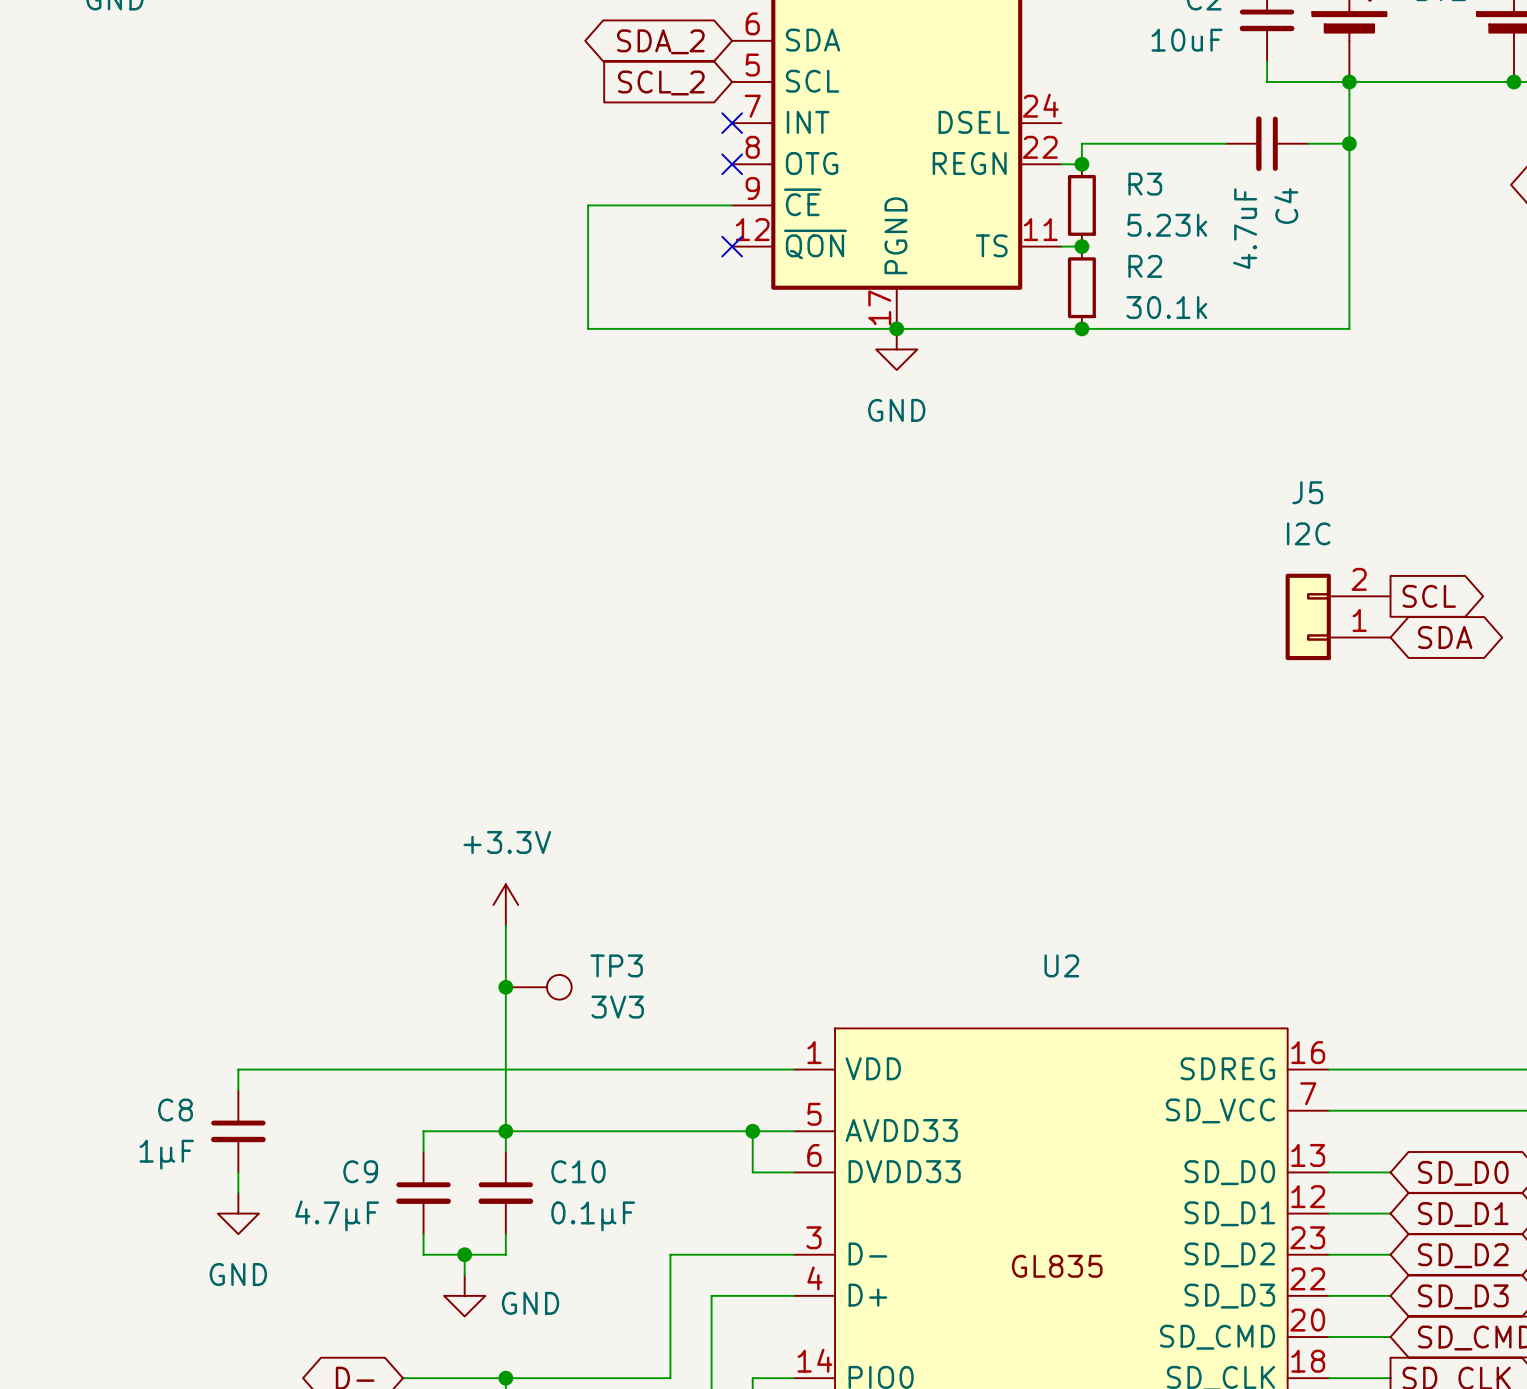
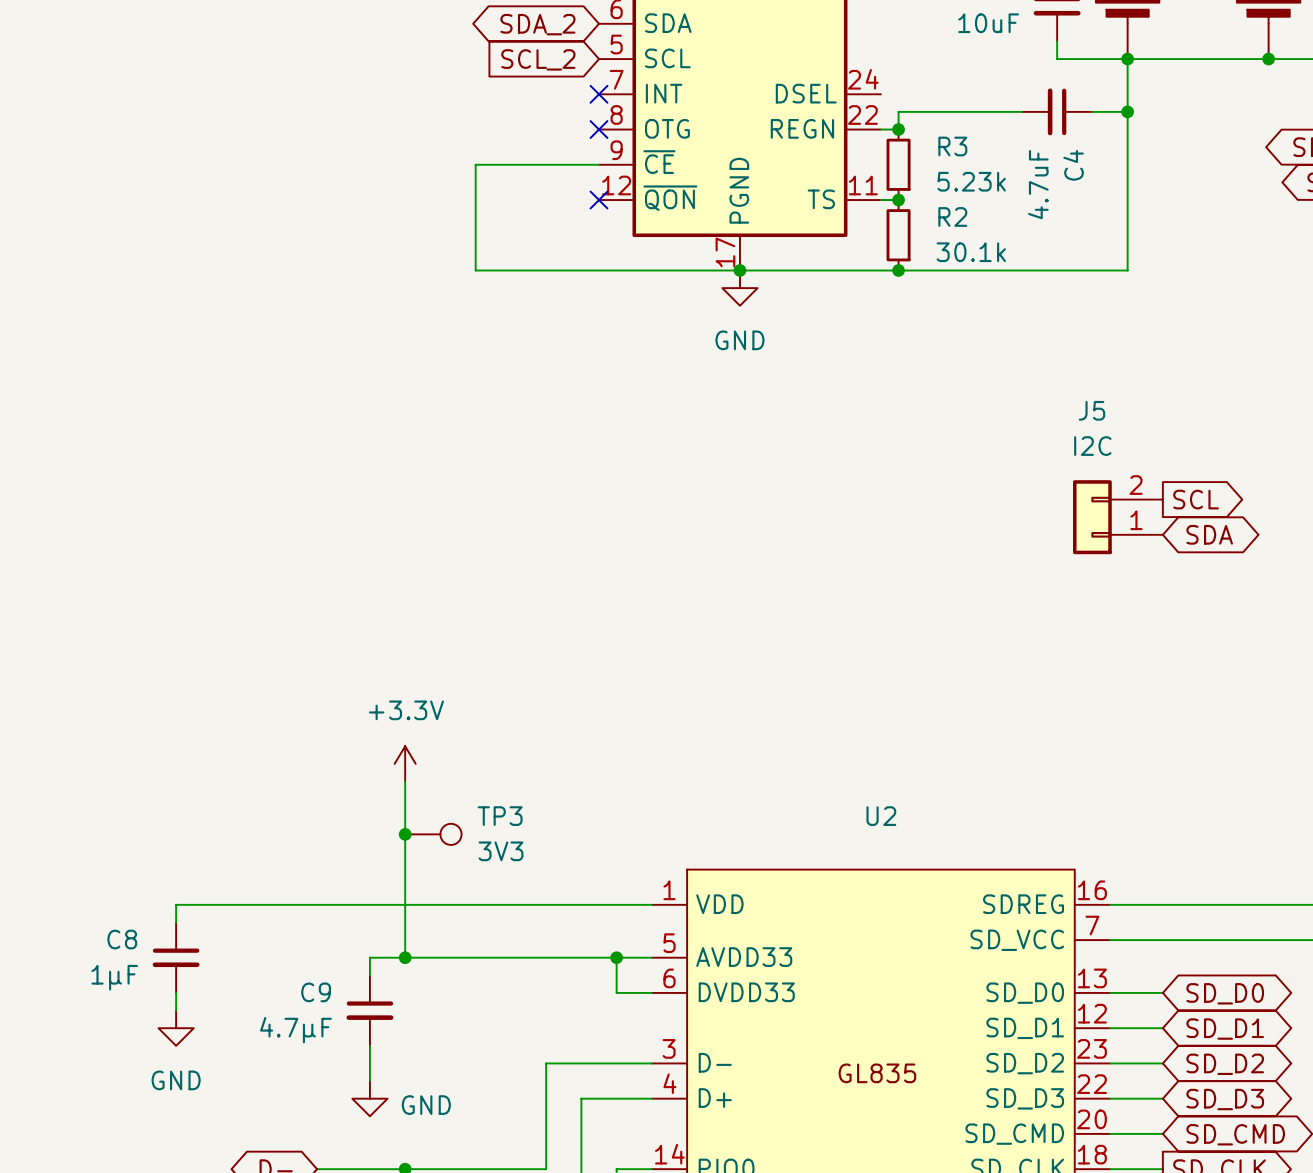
wire: (464, 1131) (423, 1131) (423, 1151) -> (369, 957) (369, 975)
wire: (505, 1131) (505, 1151) -> (369, 1045) (369, 1063)
C9 position: (423, 1193) -> (369, 1010)
C10: 0.1μF (505, 1193) -> none
wire: (423, 1234) (423, 1254) (505, 1254) (505, 1234) -> none
junction: (464, 1254) -> none

